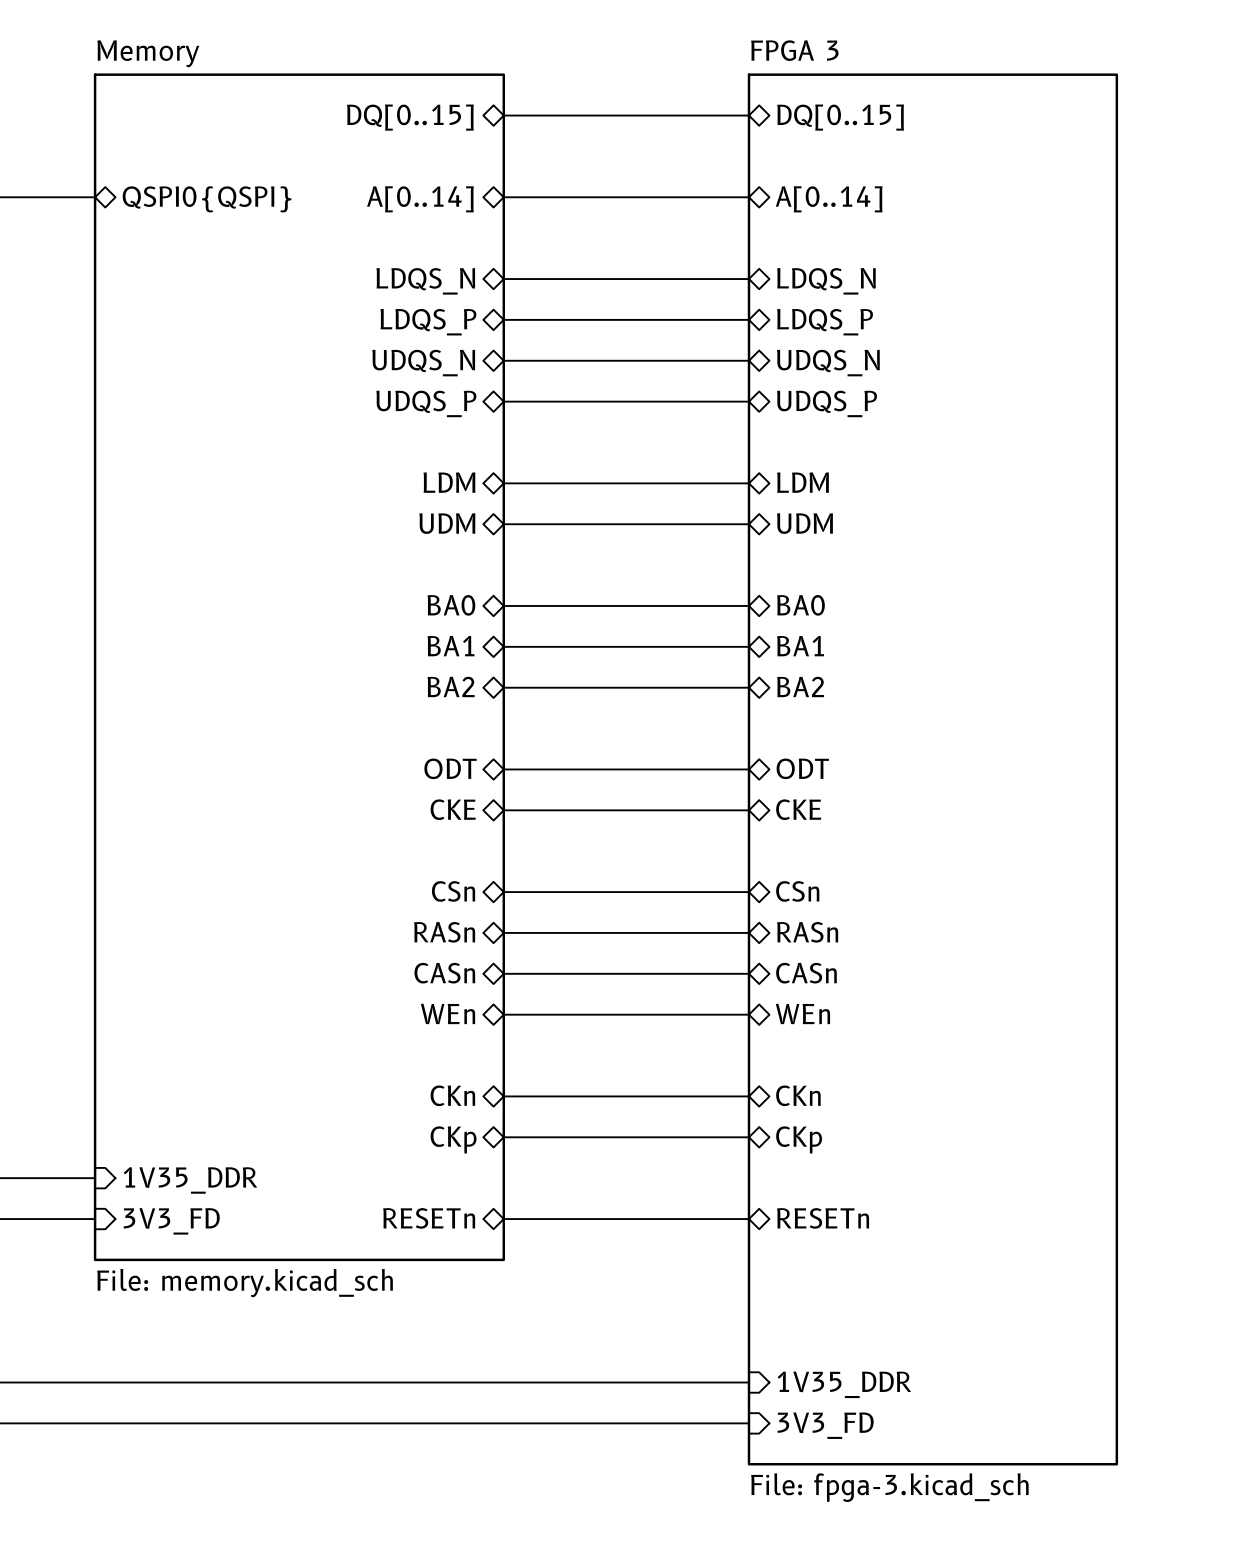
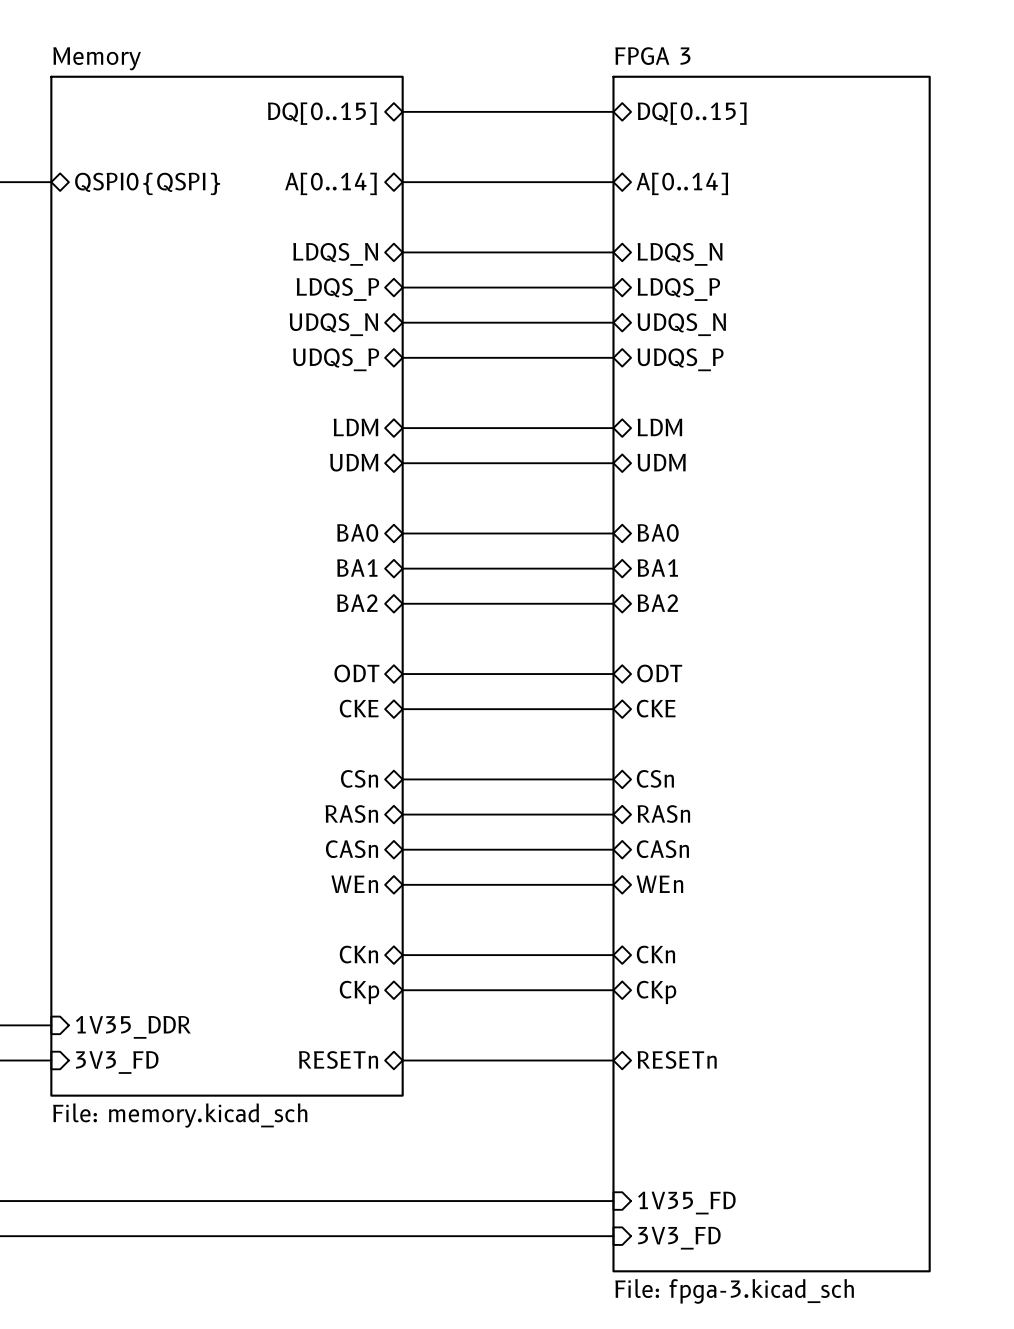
sheet pin: 1V35_DDR (844, 1384) -> 1V35_FD (686, 1203)

